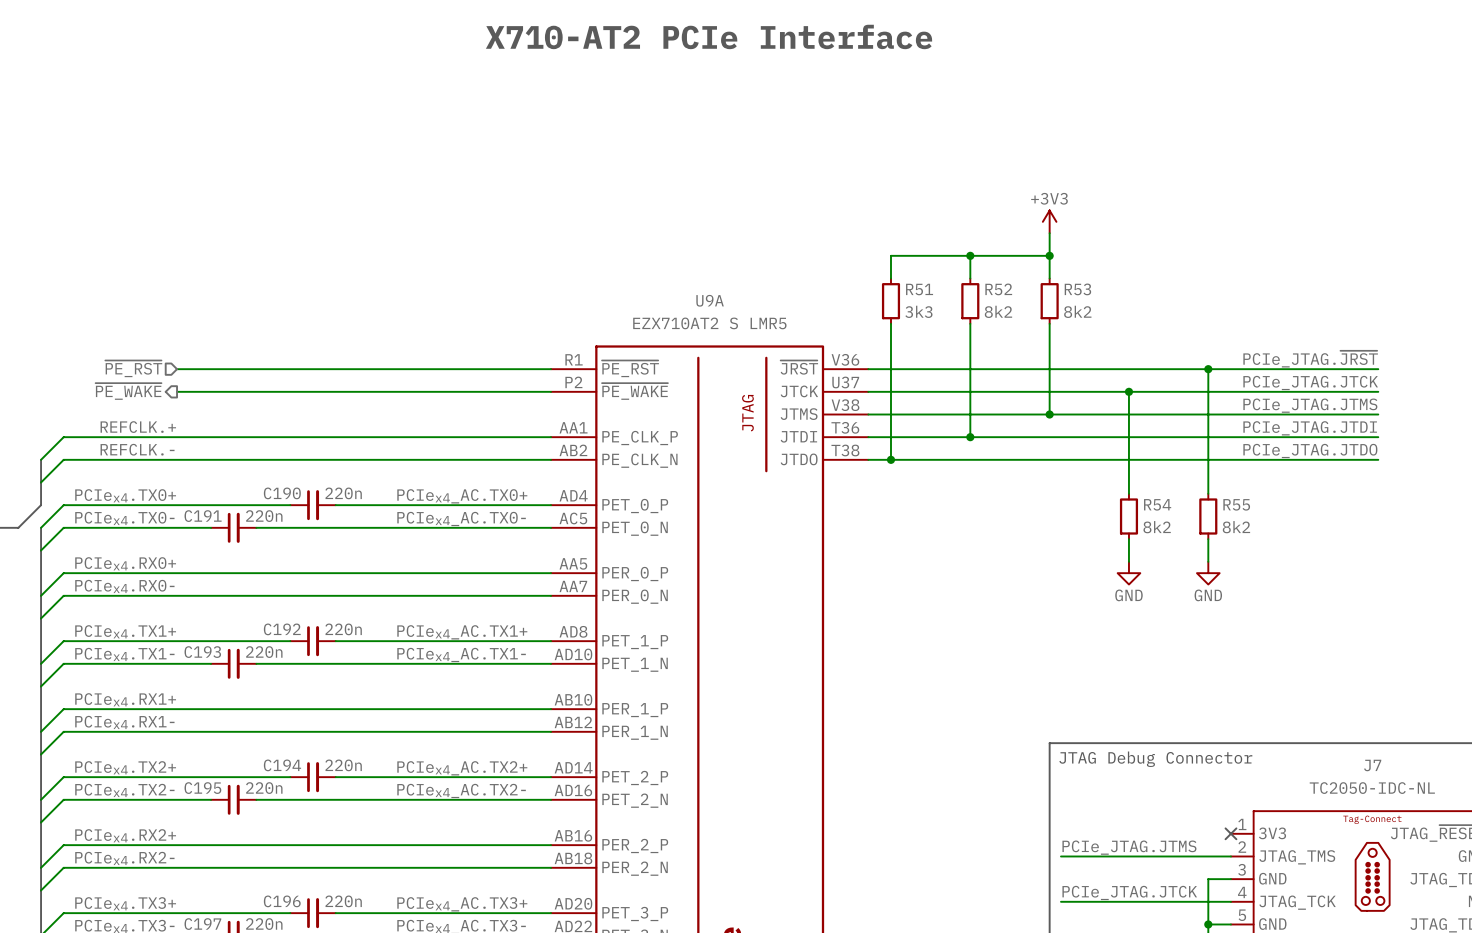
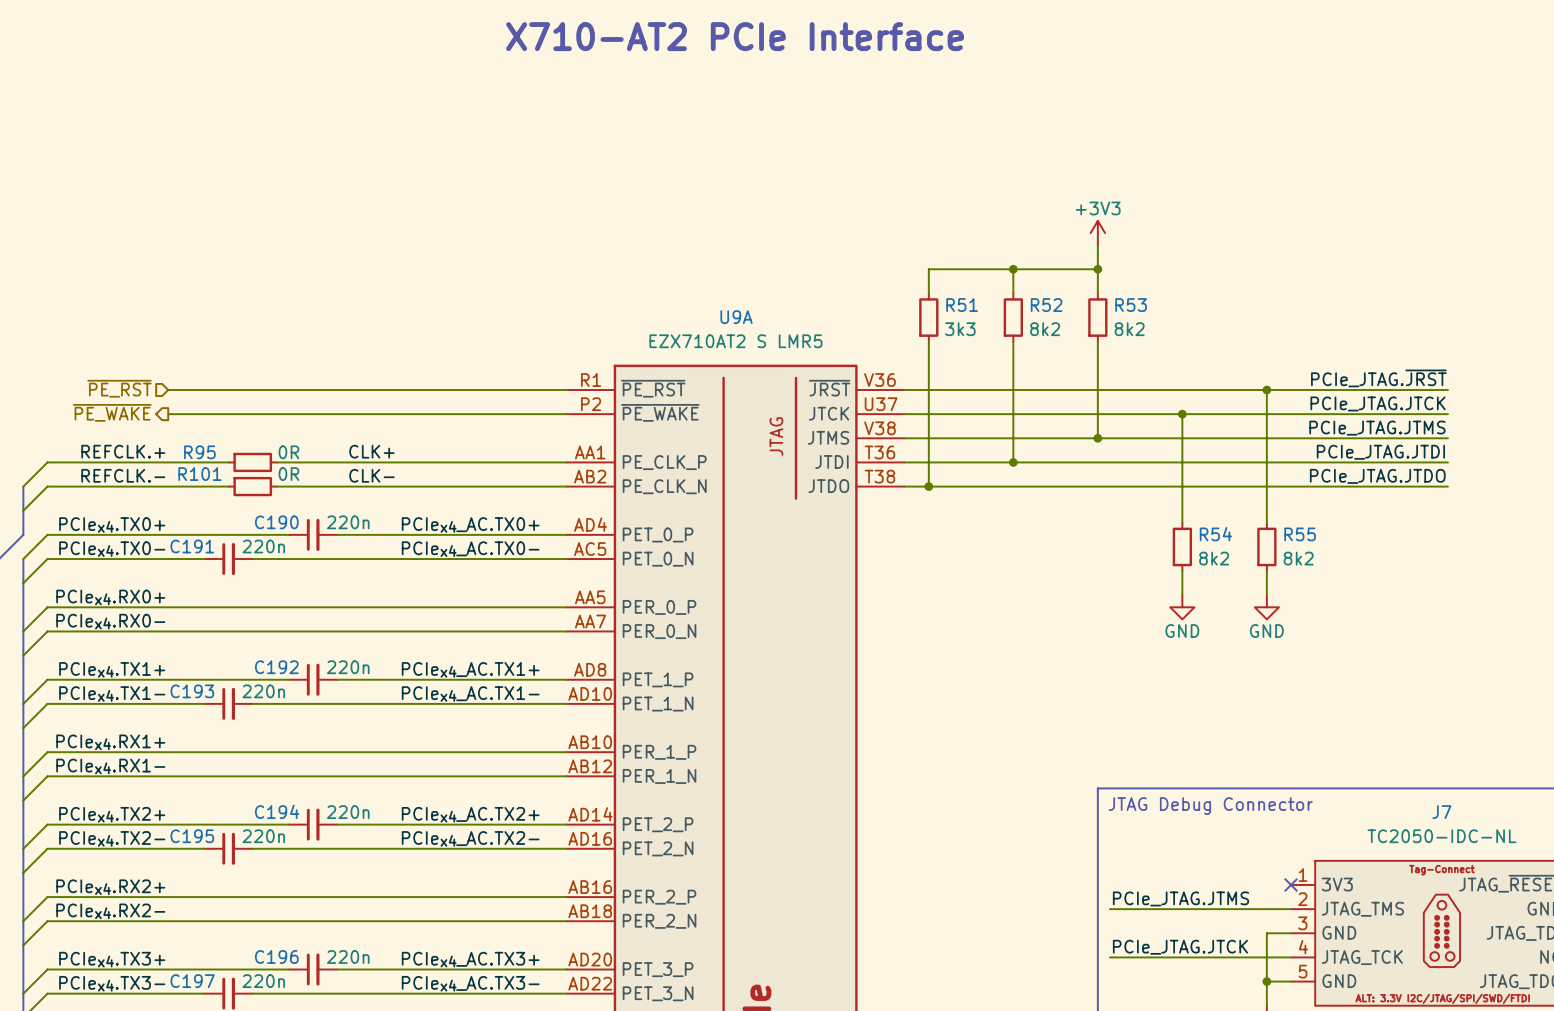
label: none -> CLK+ (371, 451)
wire: (233, 437) (279, 437) -> none
R95: none -> (252, 462)
label: none -> CLK- (371, 475)
wire: (233, 459) (279, 459) -> none
R101: none -> (252, 486)

